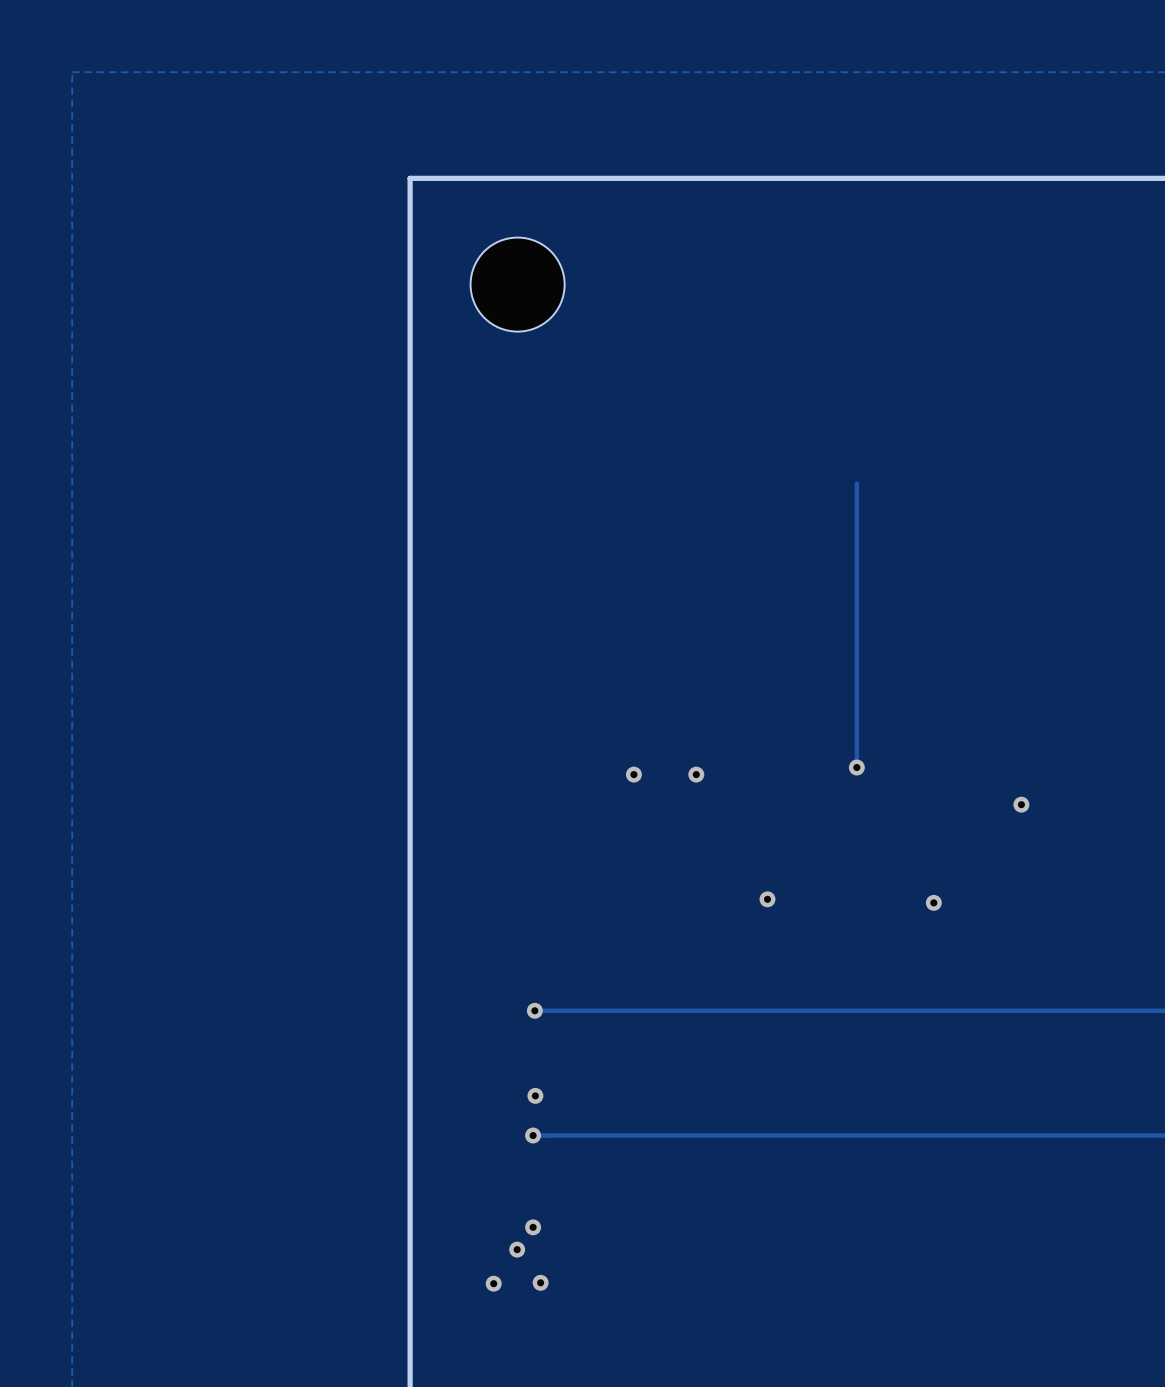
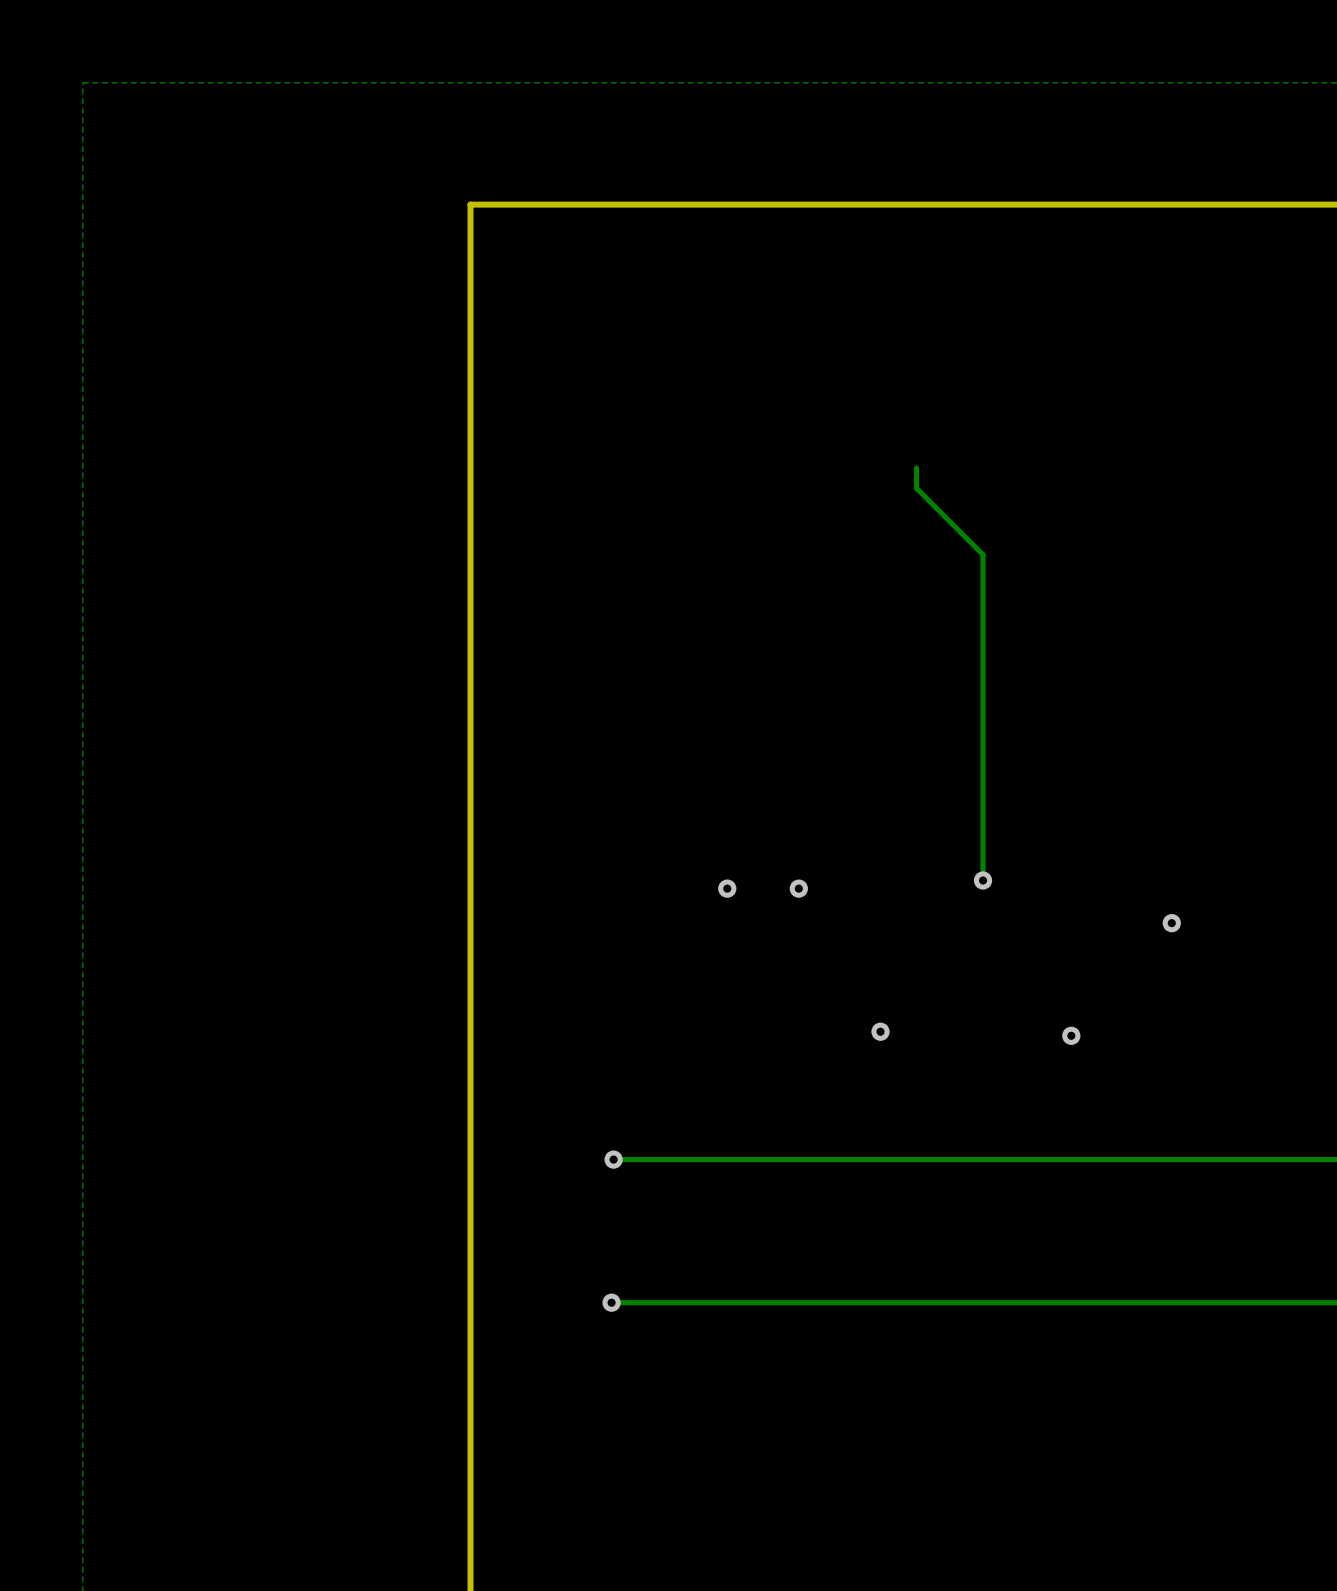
part: (517, 284) -> none
track: none -> (916, 467) (916, 488) (983, 554)
via: (535, 1095) -> none
via: (533, 1227) -> none
via: (517, 1249) -> none
via: (540, 1282) -> none
via: (493, 1283) -> none

